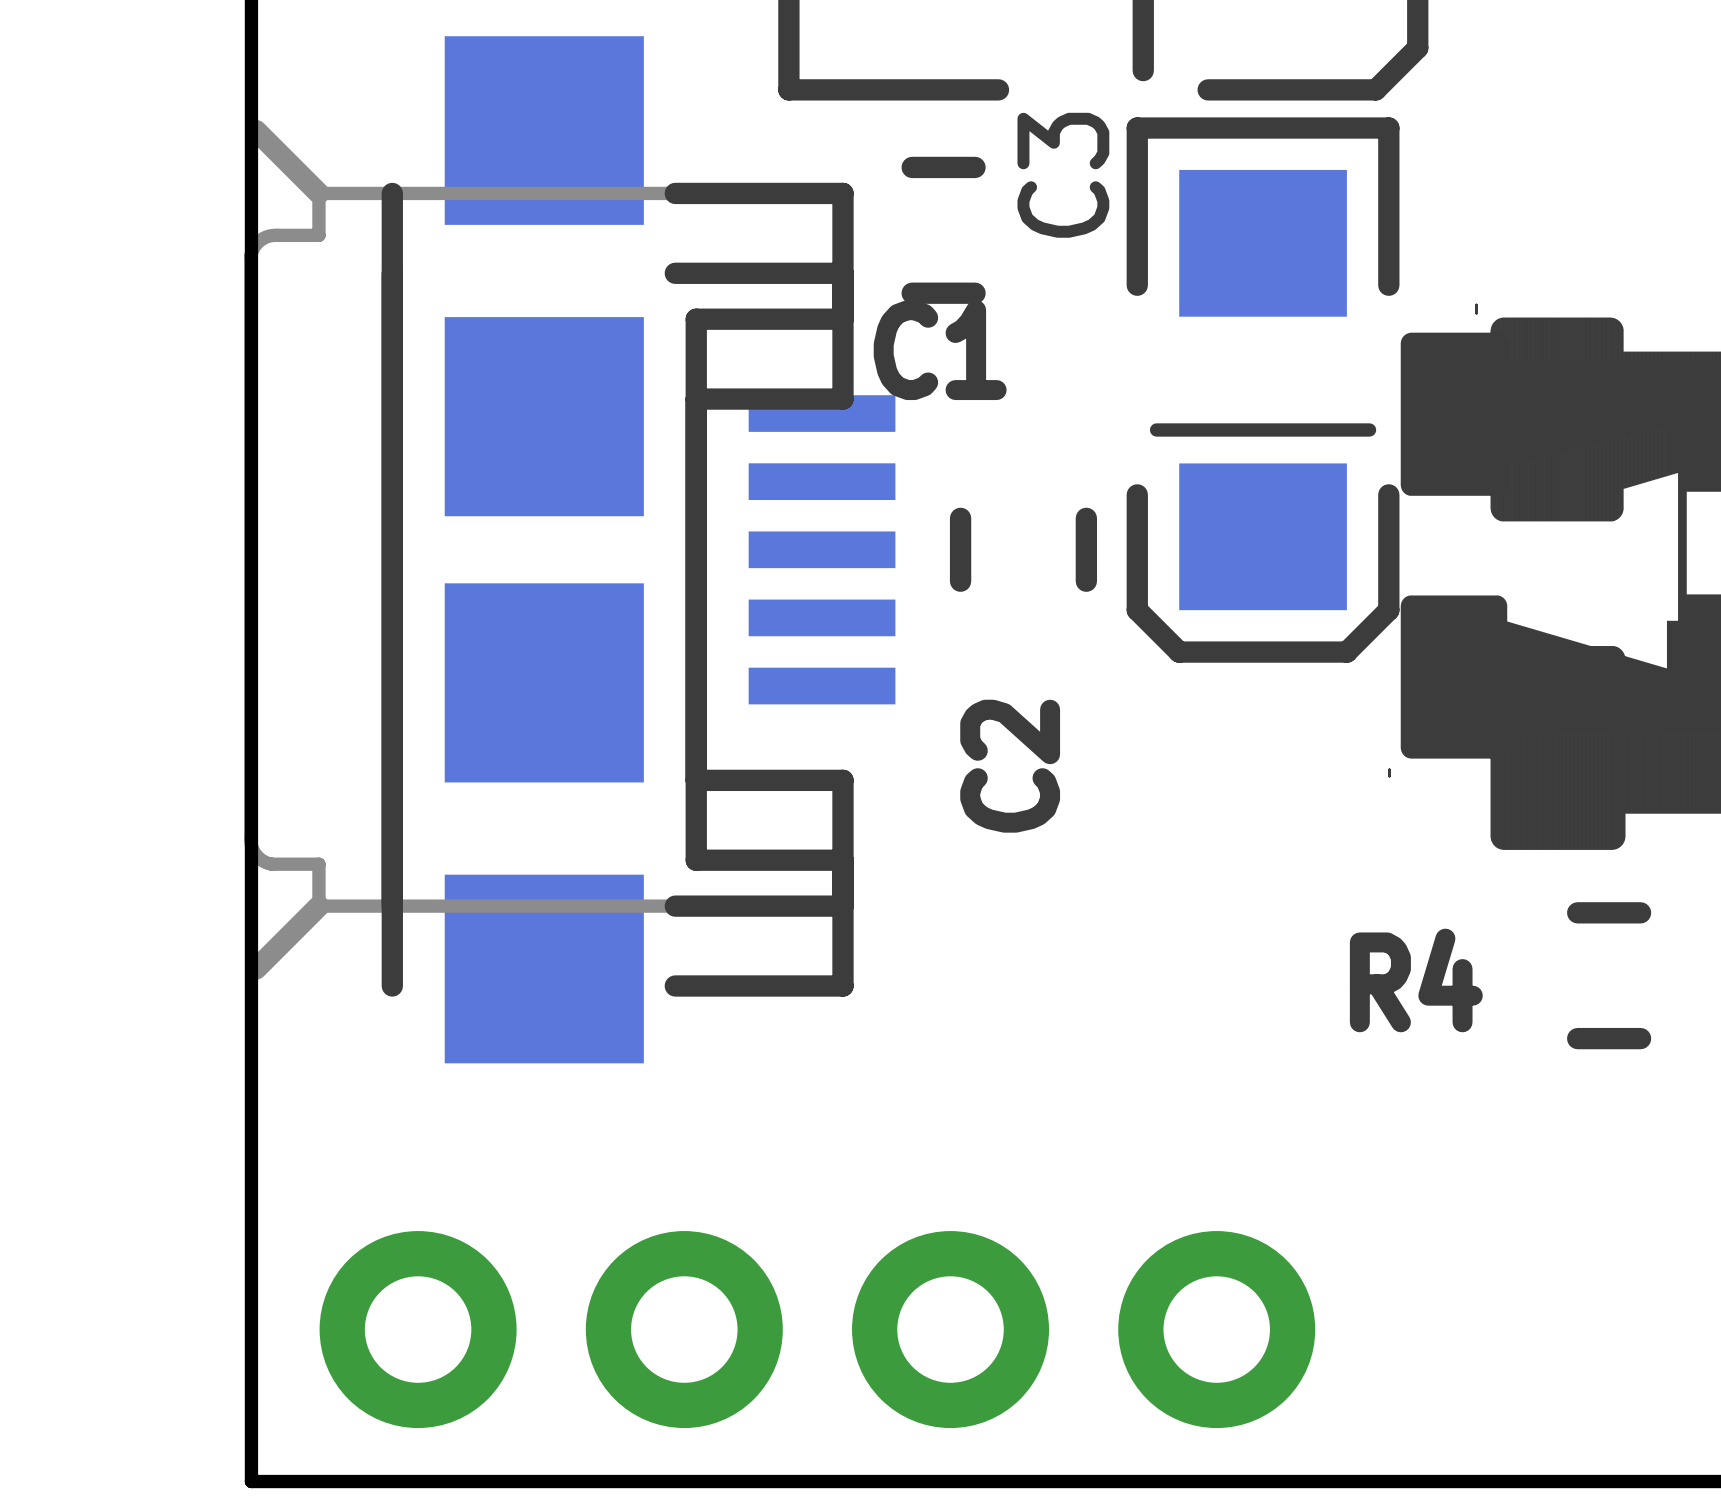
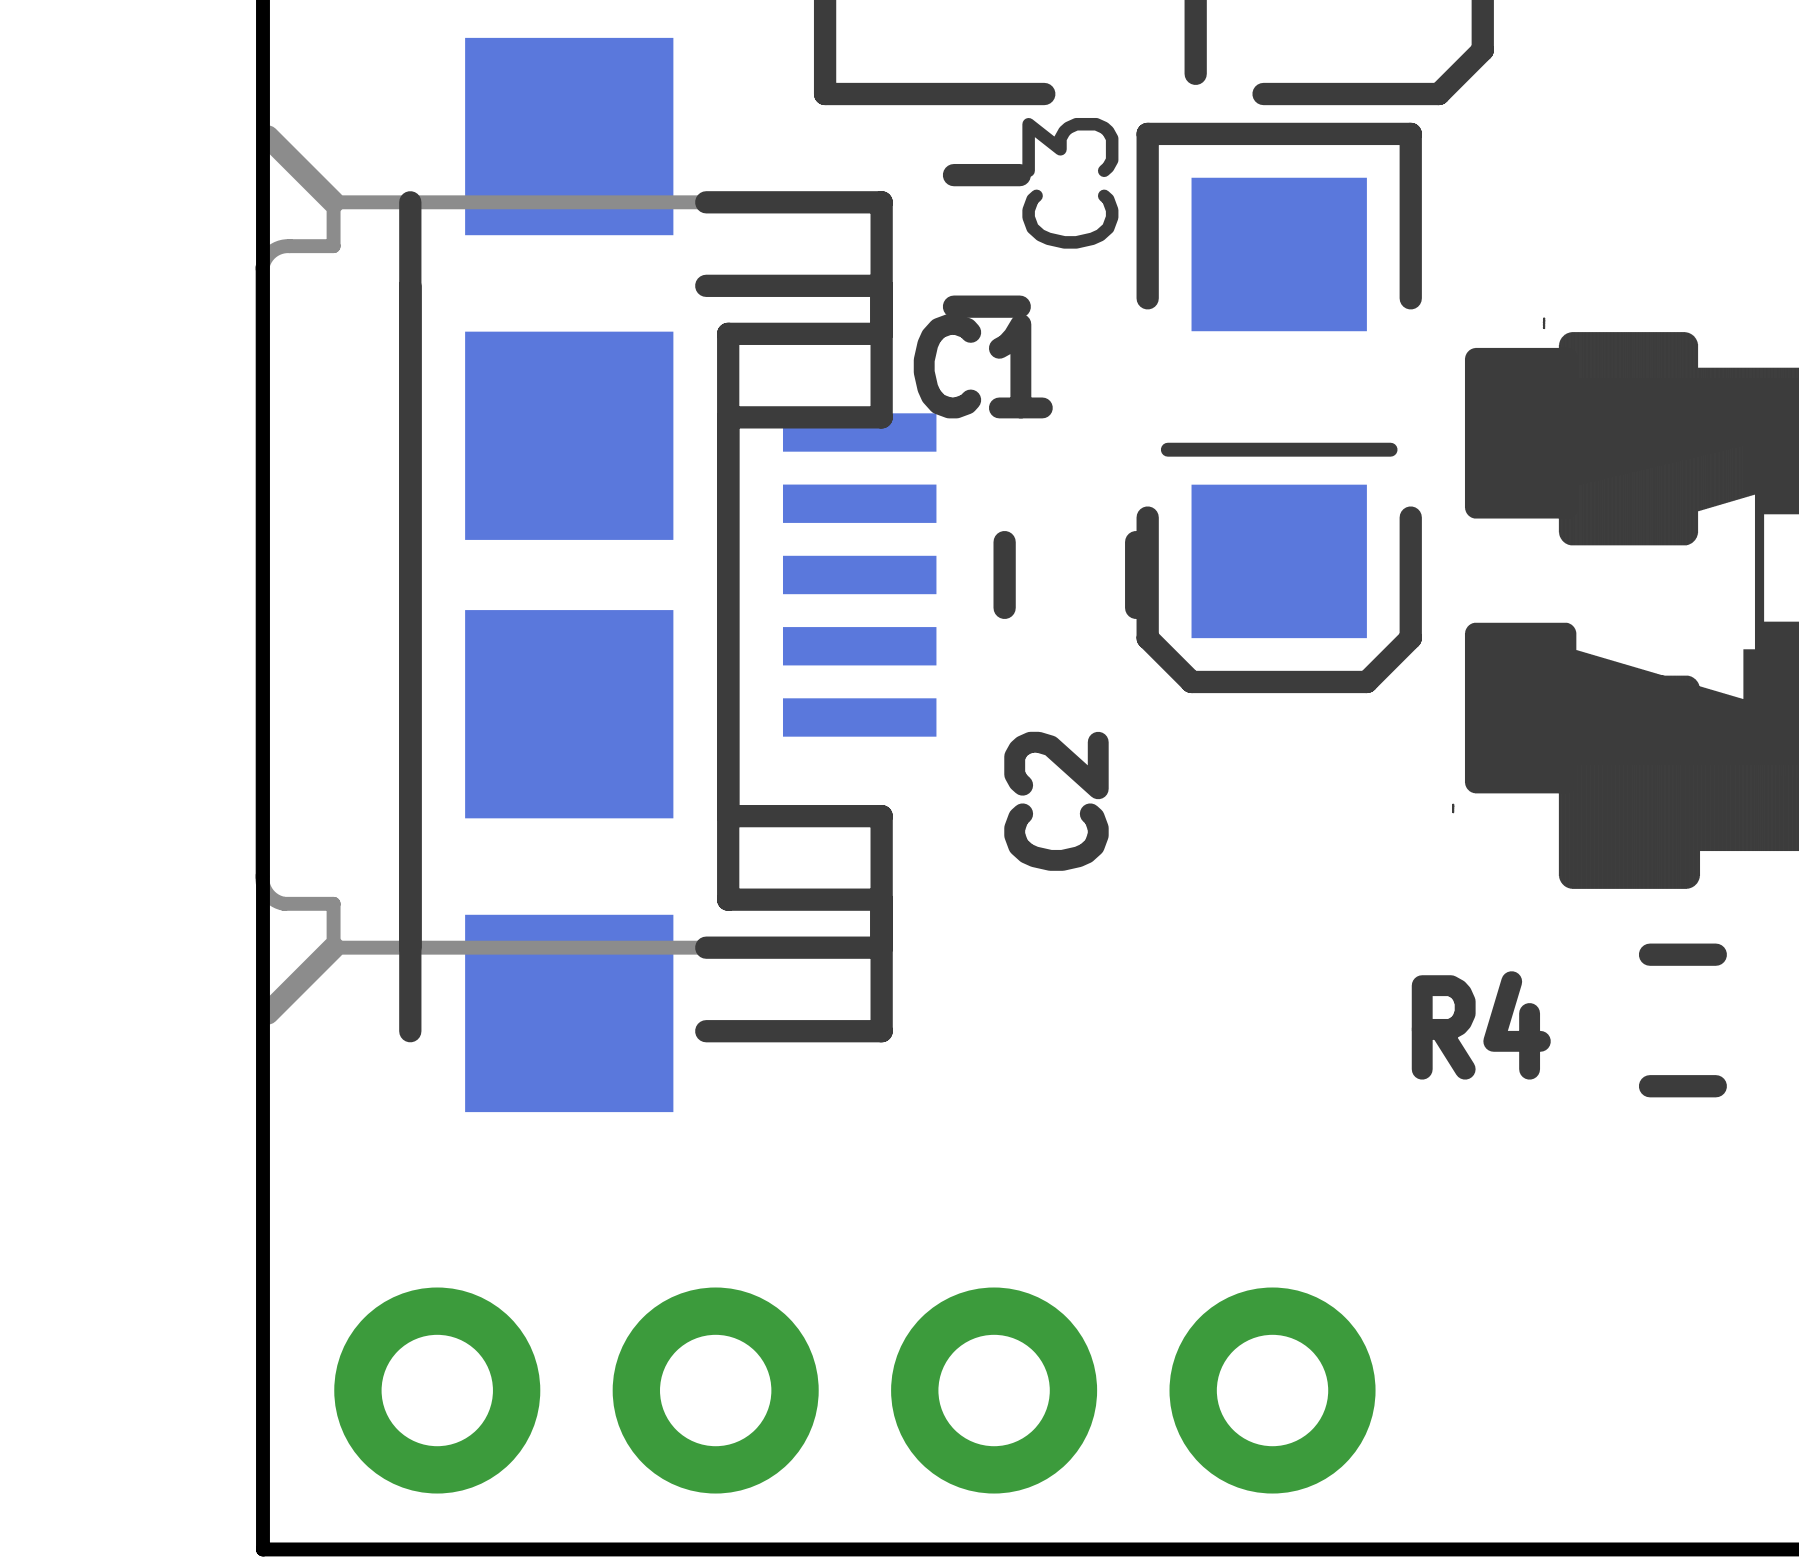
C3 position: (1263, 390) -> (1279, 407)

